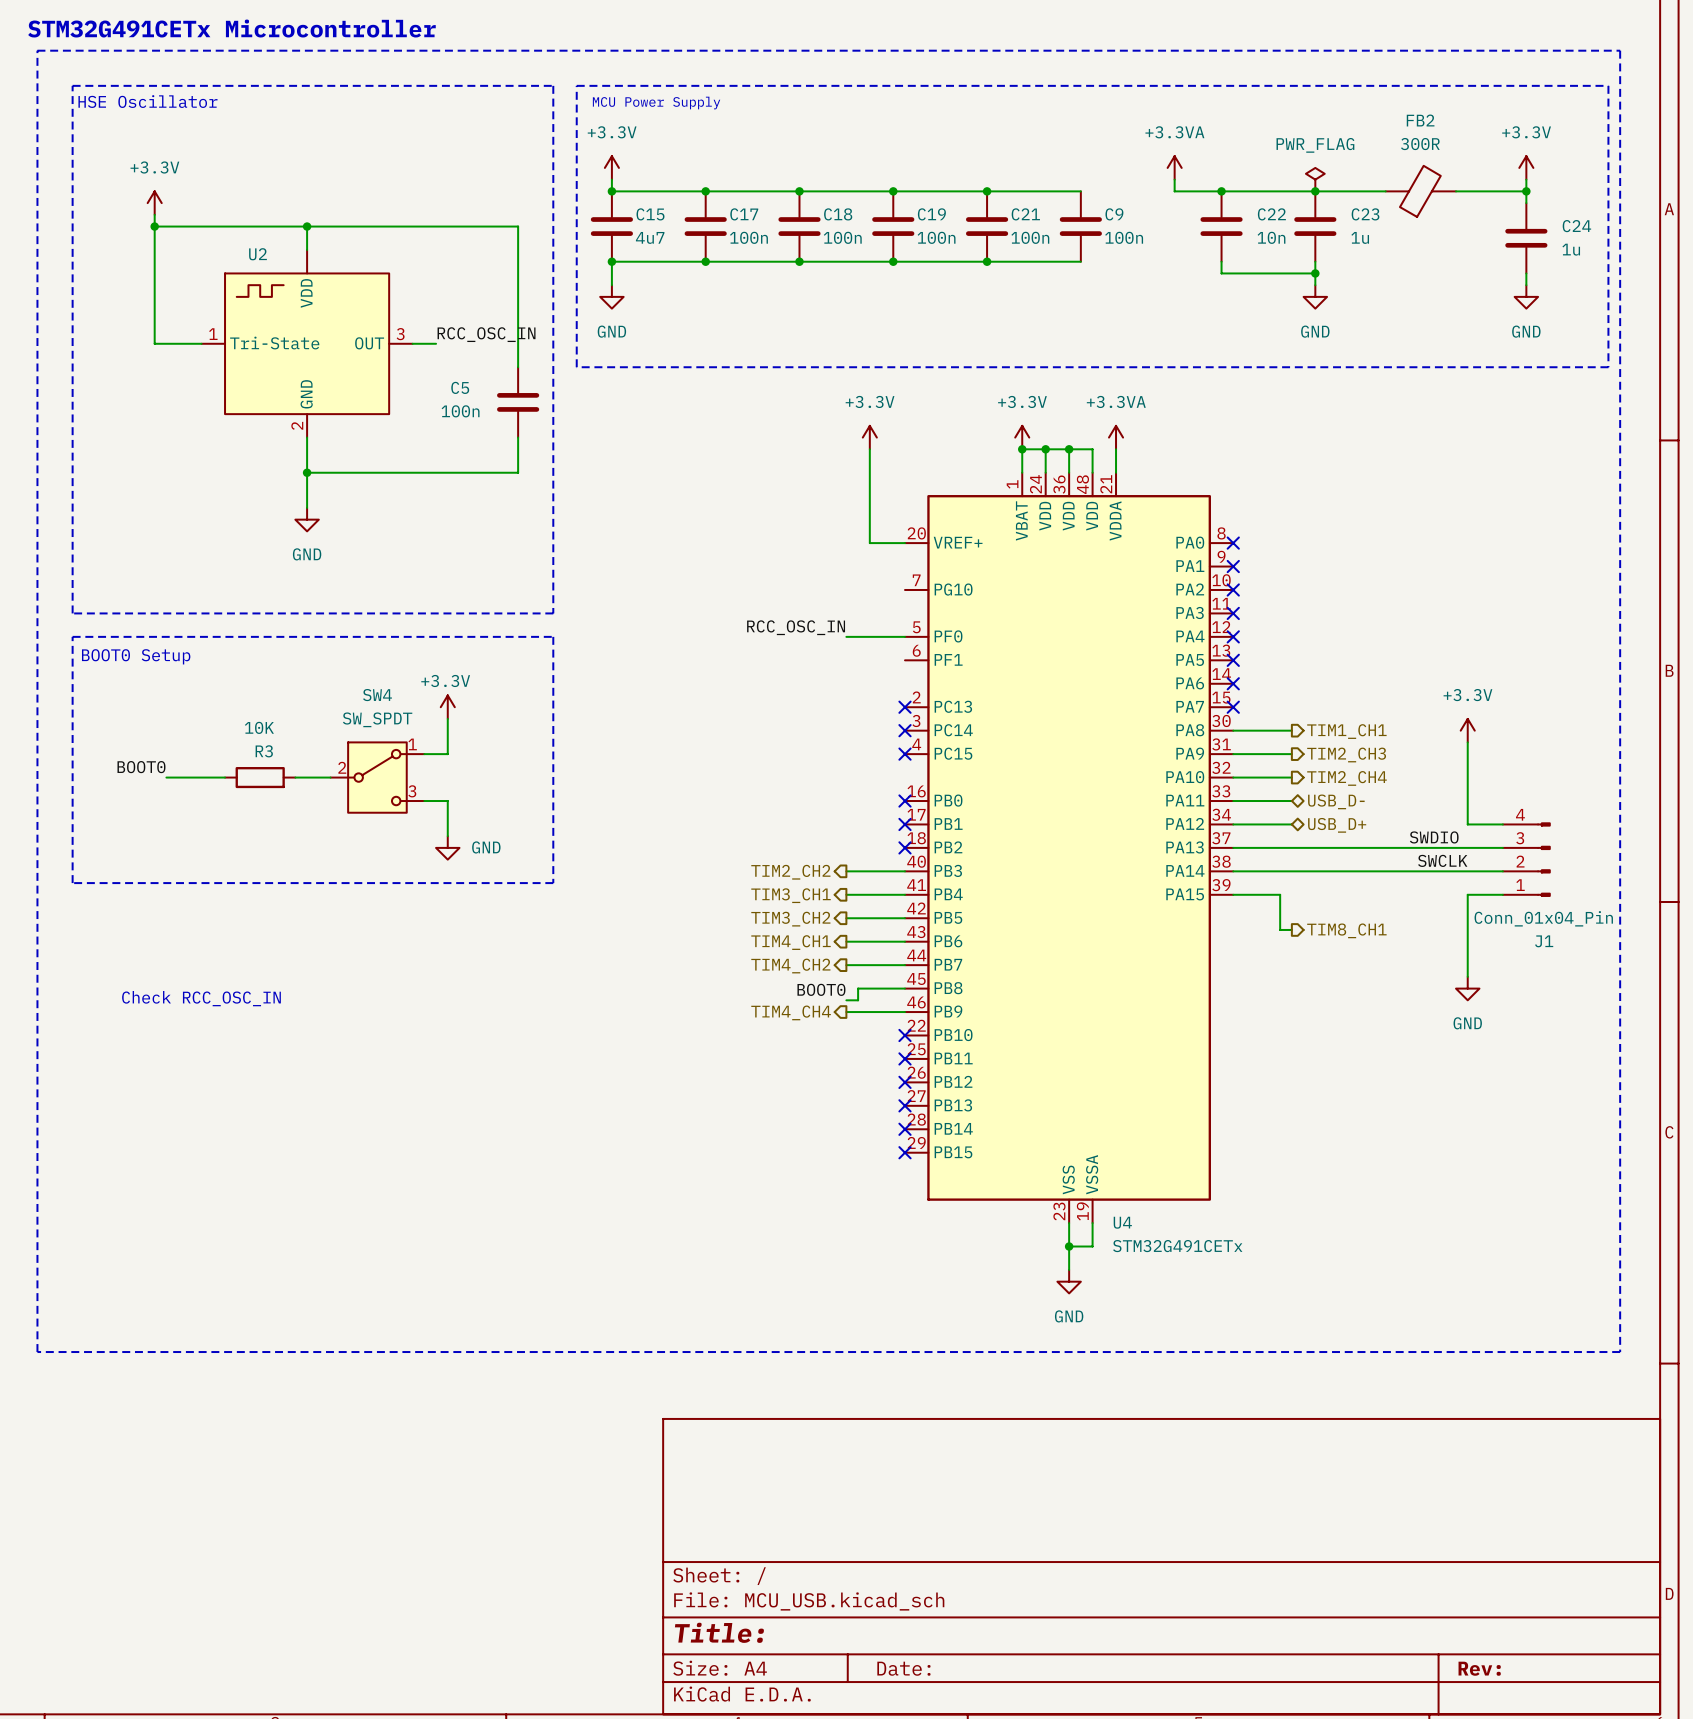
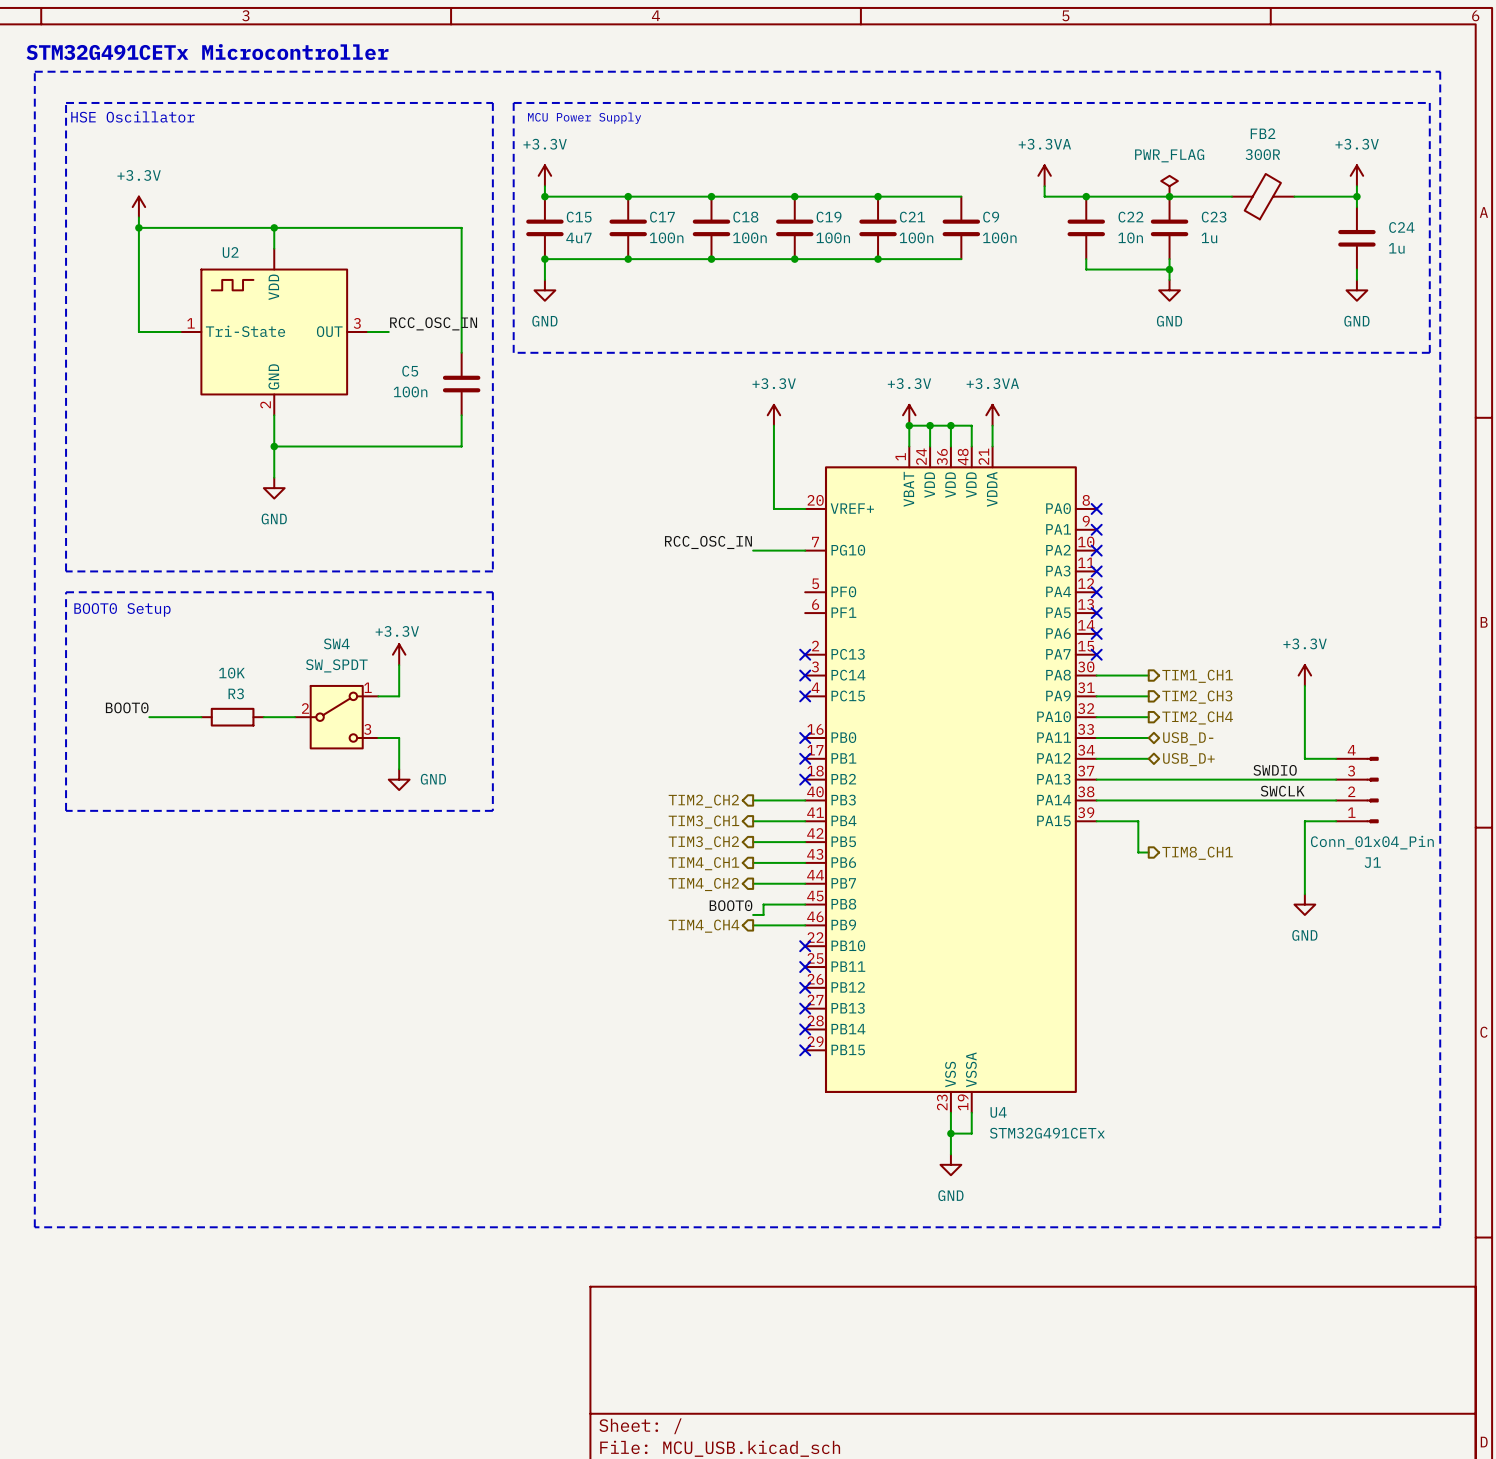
label position: RCC_OSC_IN (796, 627) -> RCC_OSC_IN (708, 542)
wire: (846, 636) (905, 636) -> (753, 550) (805, 550)
text: Check RCC_OSC_IN (201, 998) -> none

